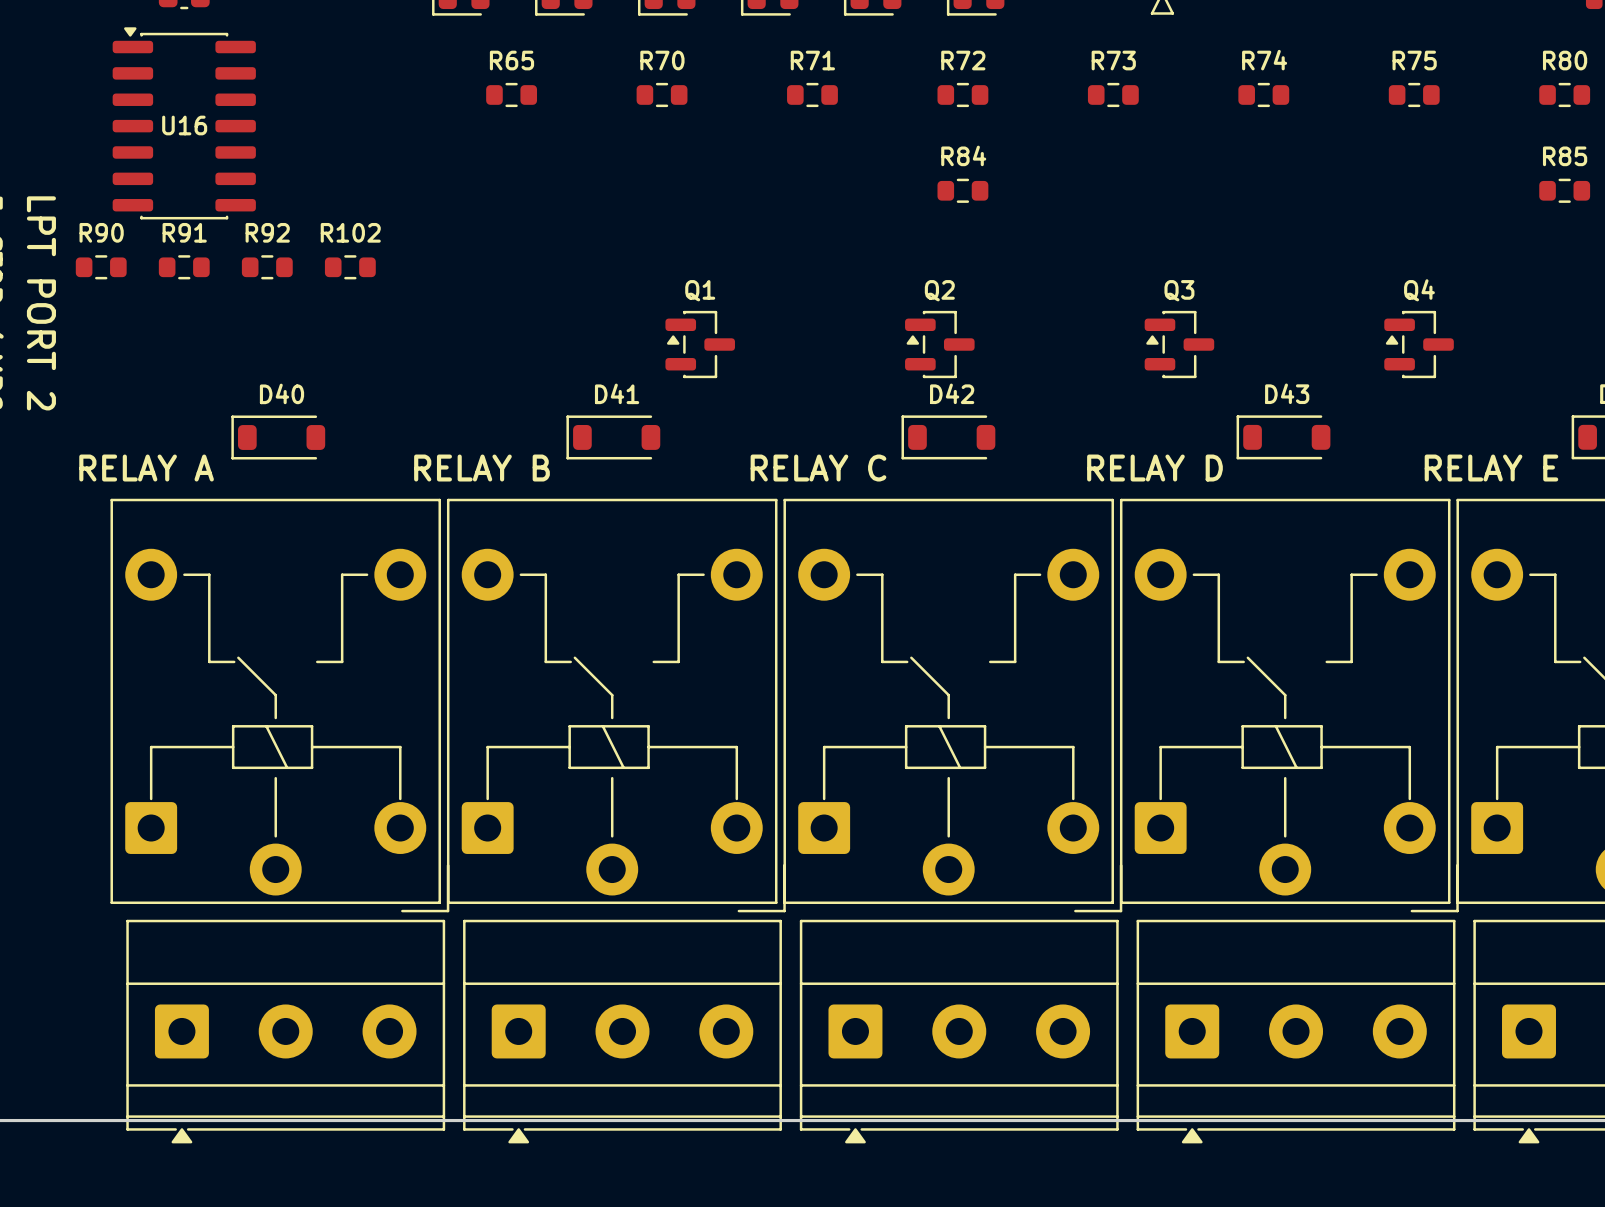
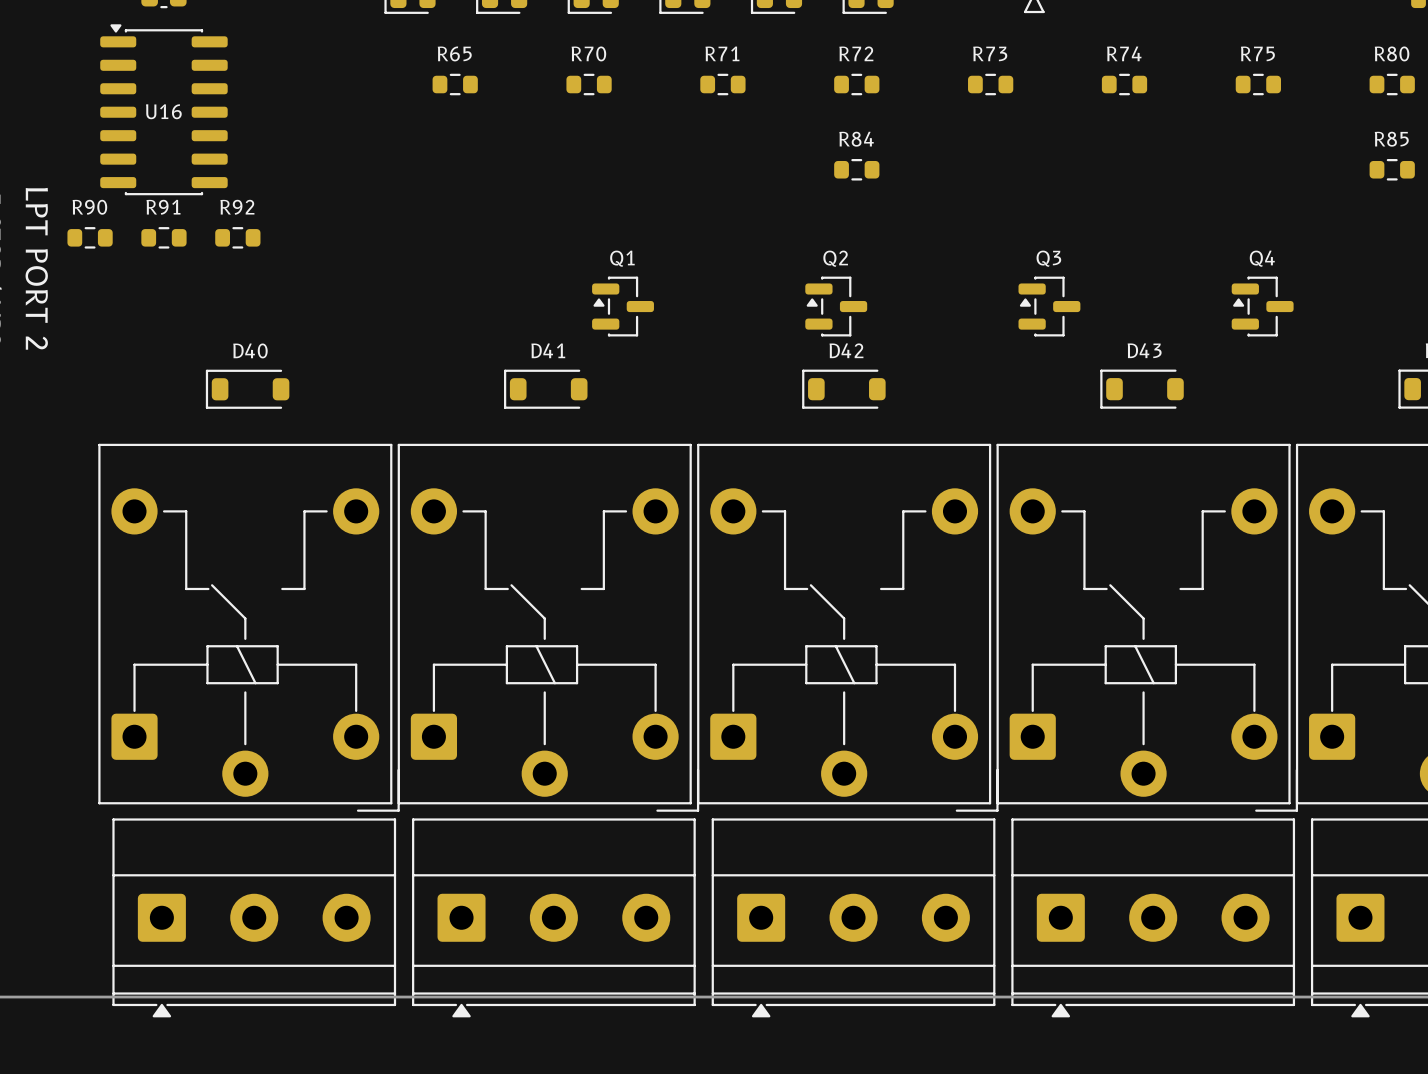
R102: (350, 267) -> none
text: RELAY A (146, 468) -> none
text: RELAY B (481, 468) -> none
text: RELAY C (818, 468) -> none
text: RELAY D (1154, 468) -> none
text: RELAY E (1491, 468) -> none

